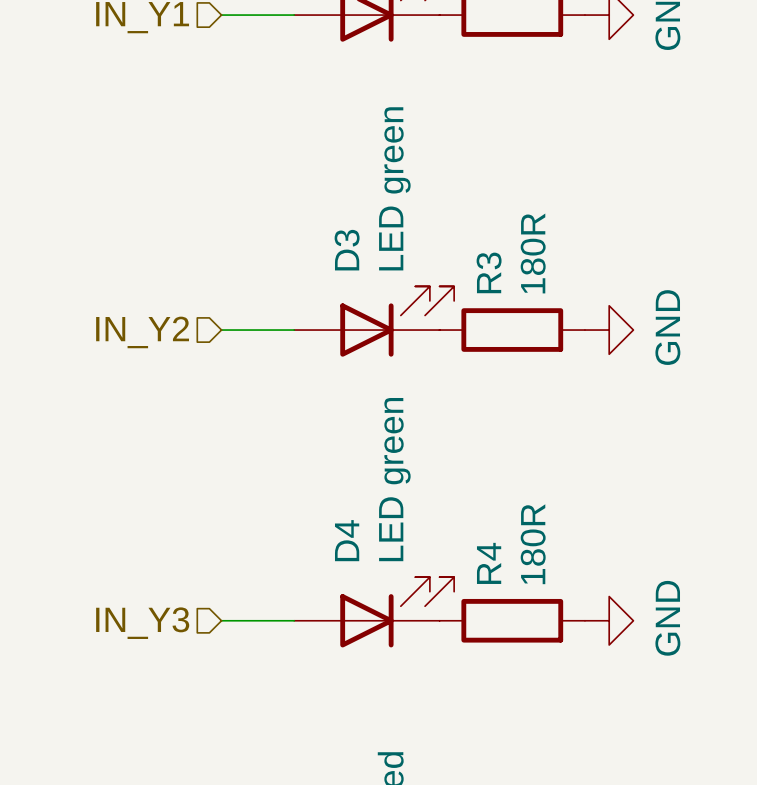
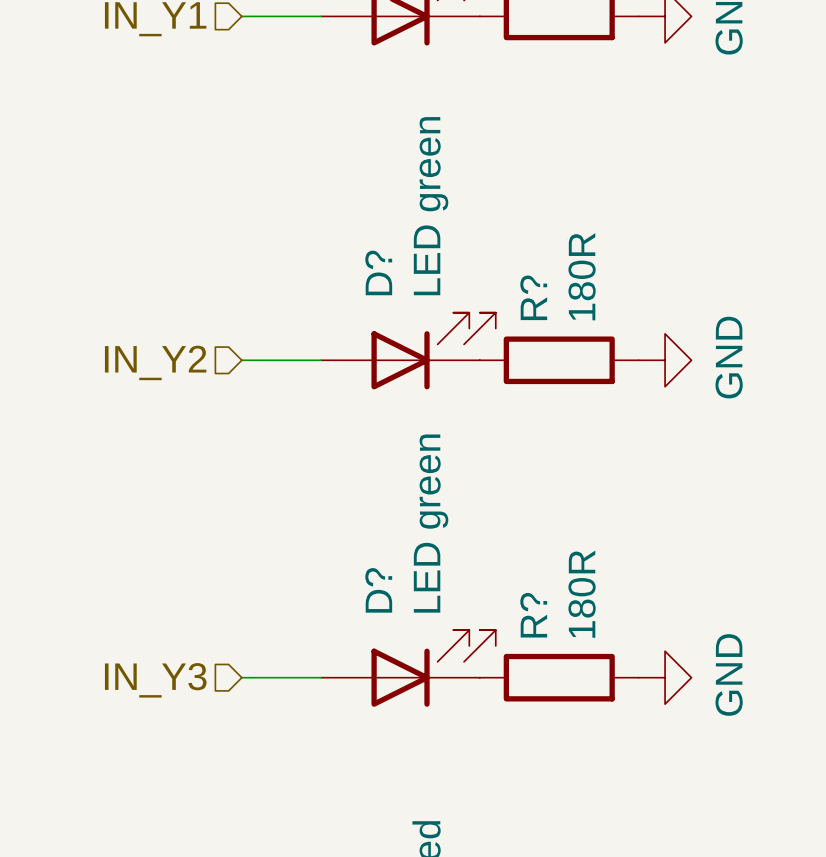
D3 name: D3 (347, 250) -> D? (378, 272)
R3 name: R3 (489, 272) -> R? (533, 297)
D4 name: D4 (347, 540) -> D? (378, 590)
R4 name: R4 (489, 563) -> R? (533, 615)

